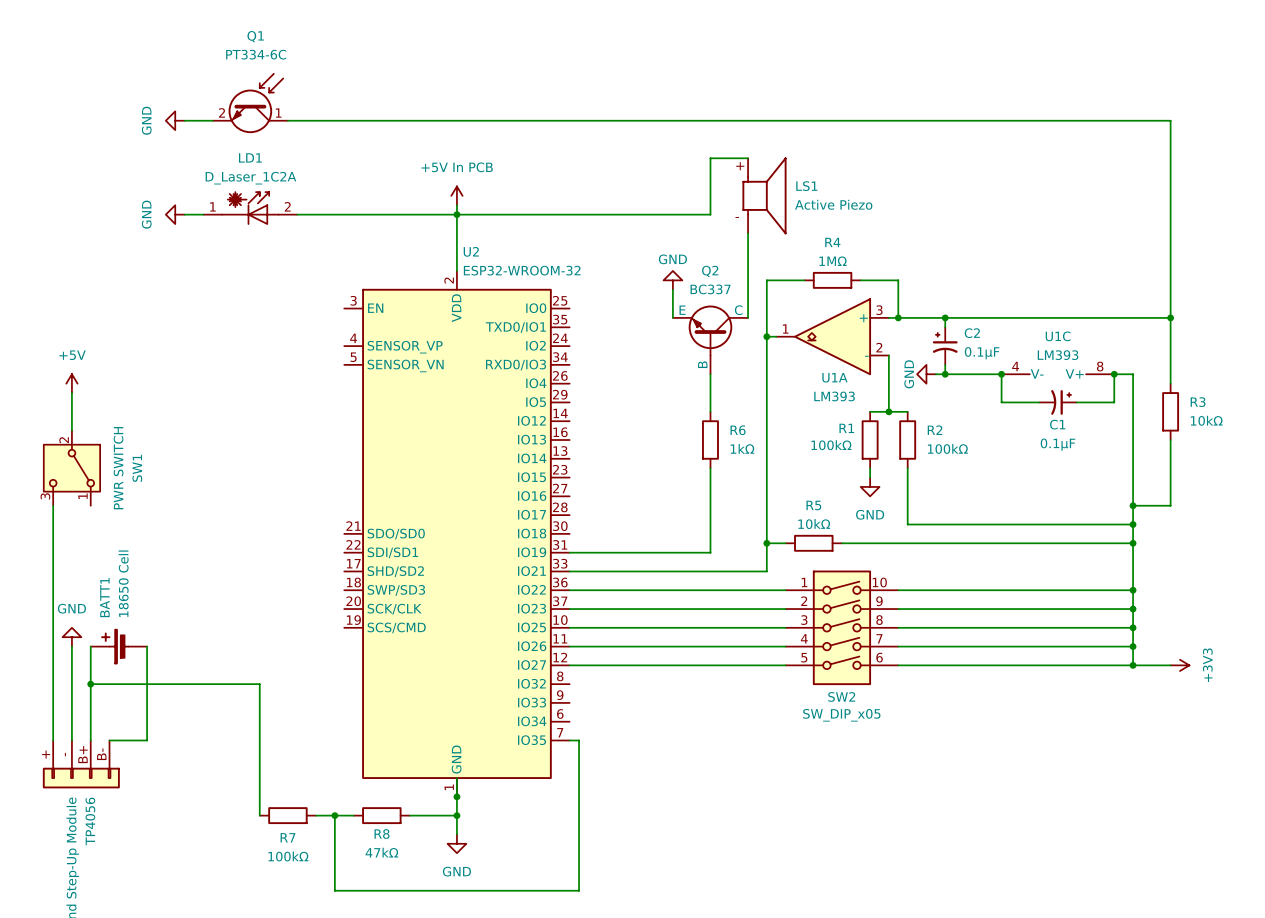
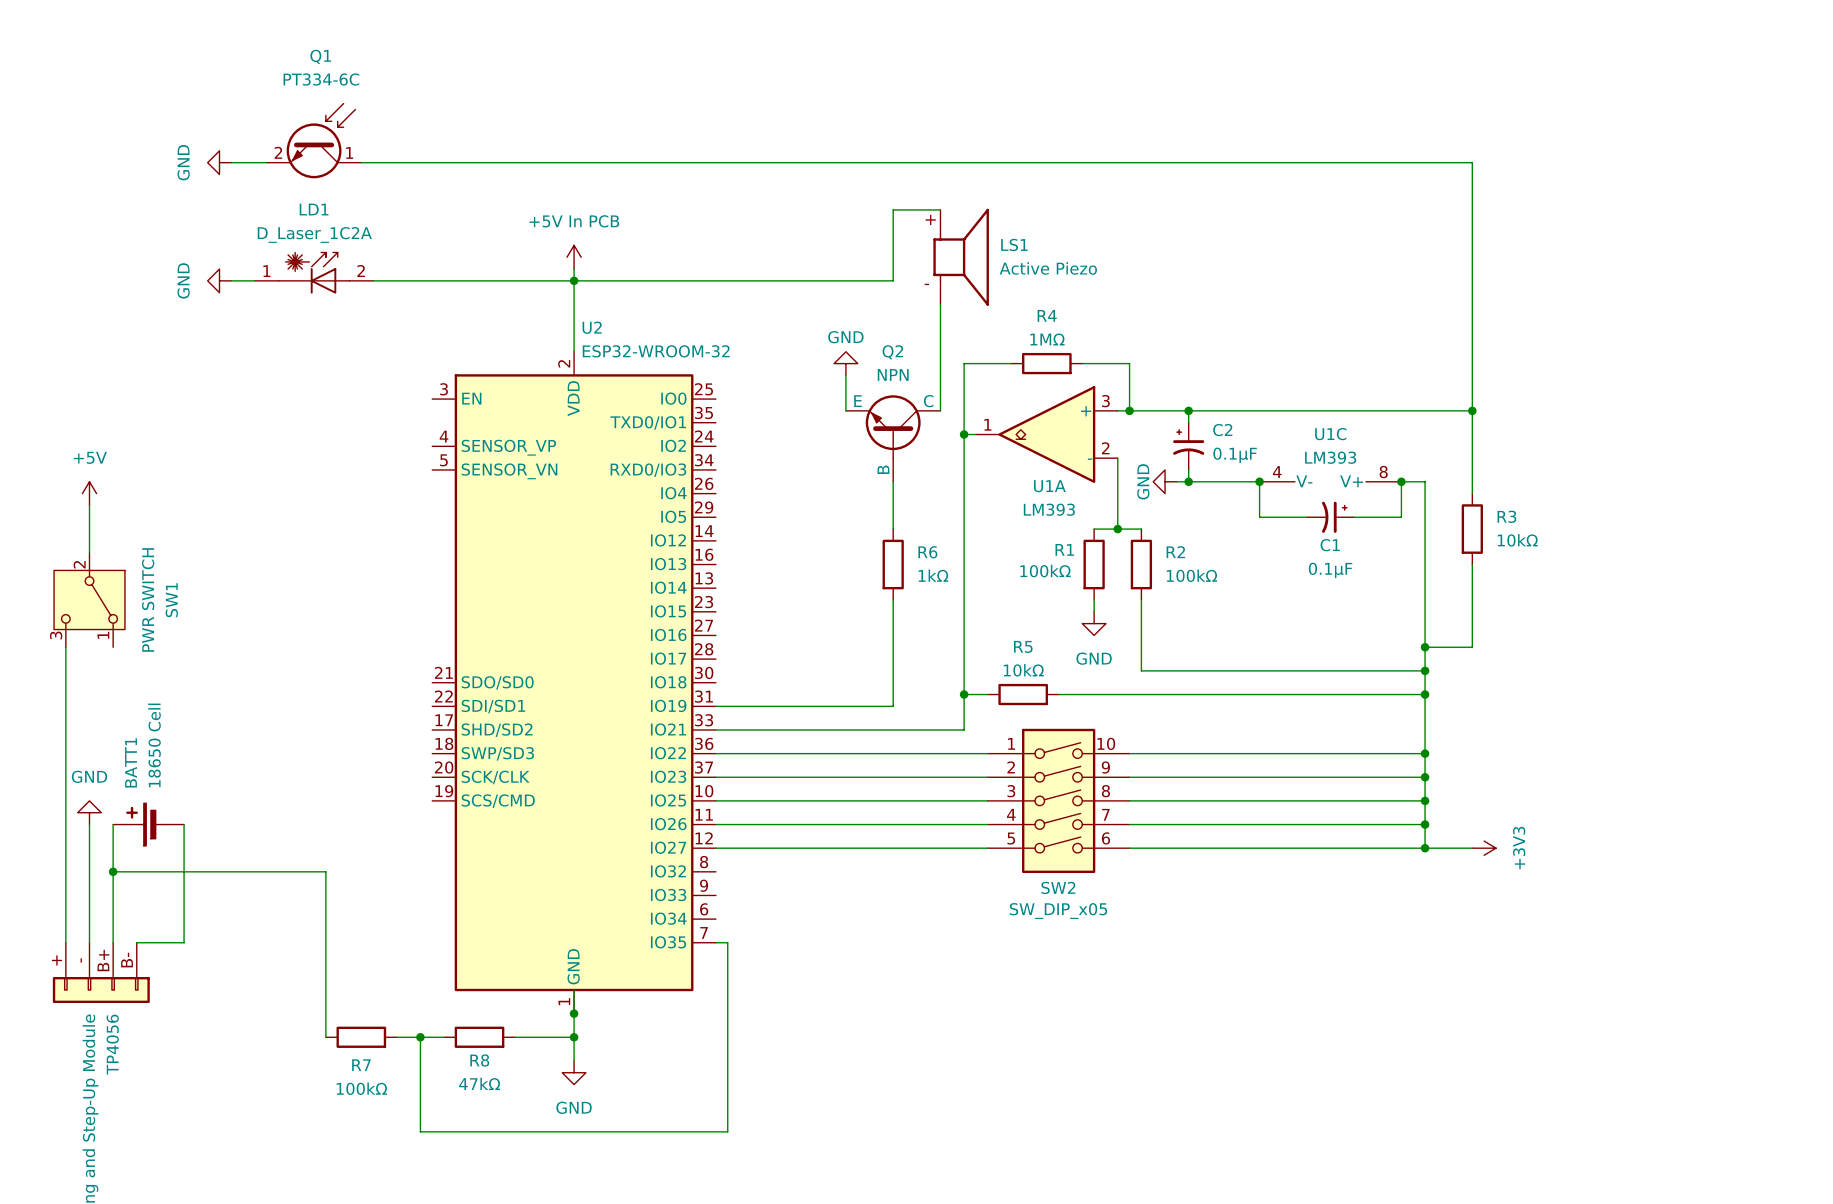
Q2 value: BC337 (710, 289) -> NPN (893, 374)

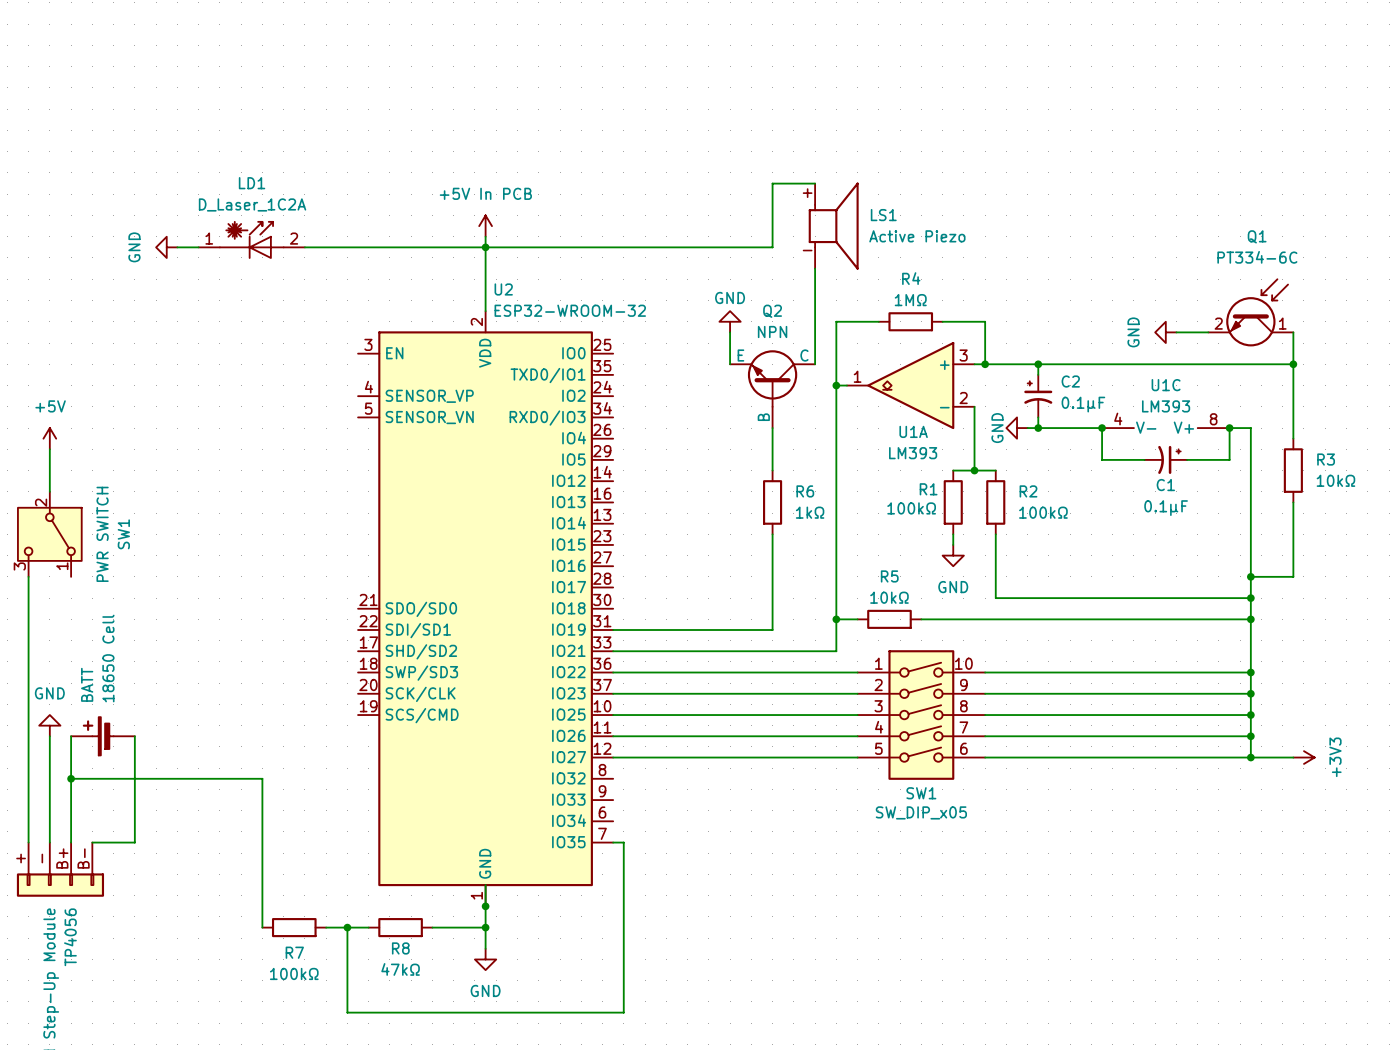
Q1 position: (314, 140) -> (1250, 312)
power symbol: GND (219, 162) -> none
wire: (231, 162) (266, 162) -> none
wire: (361, 162) (1472, 162) (1472, 375) -> none
power symbol: none -> GND (1165, 332)
wire: none -> (1176, 332) (1208, 332)
BATT1 name: BATT1 (131, 762) -> BATT (87, 684)
SW2 name: SW2 (1058, 887) -> SW1 (921, 793)

